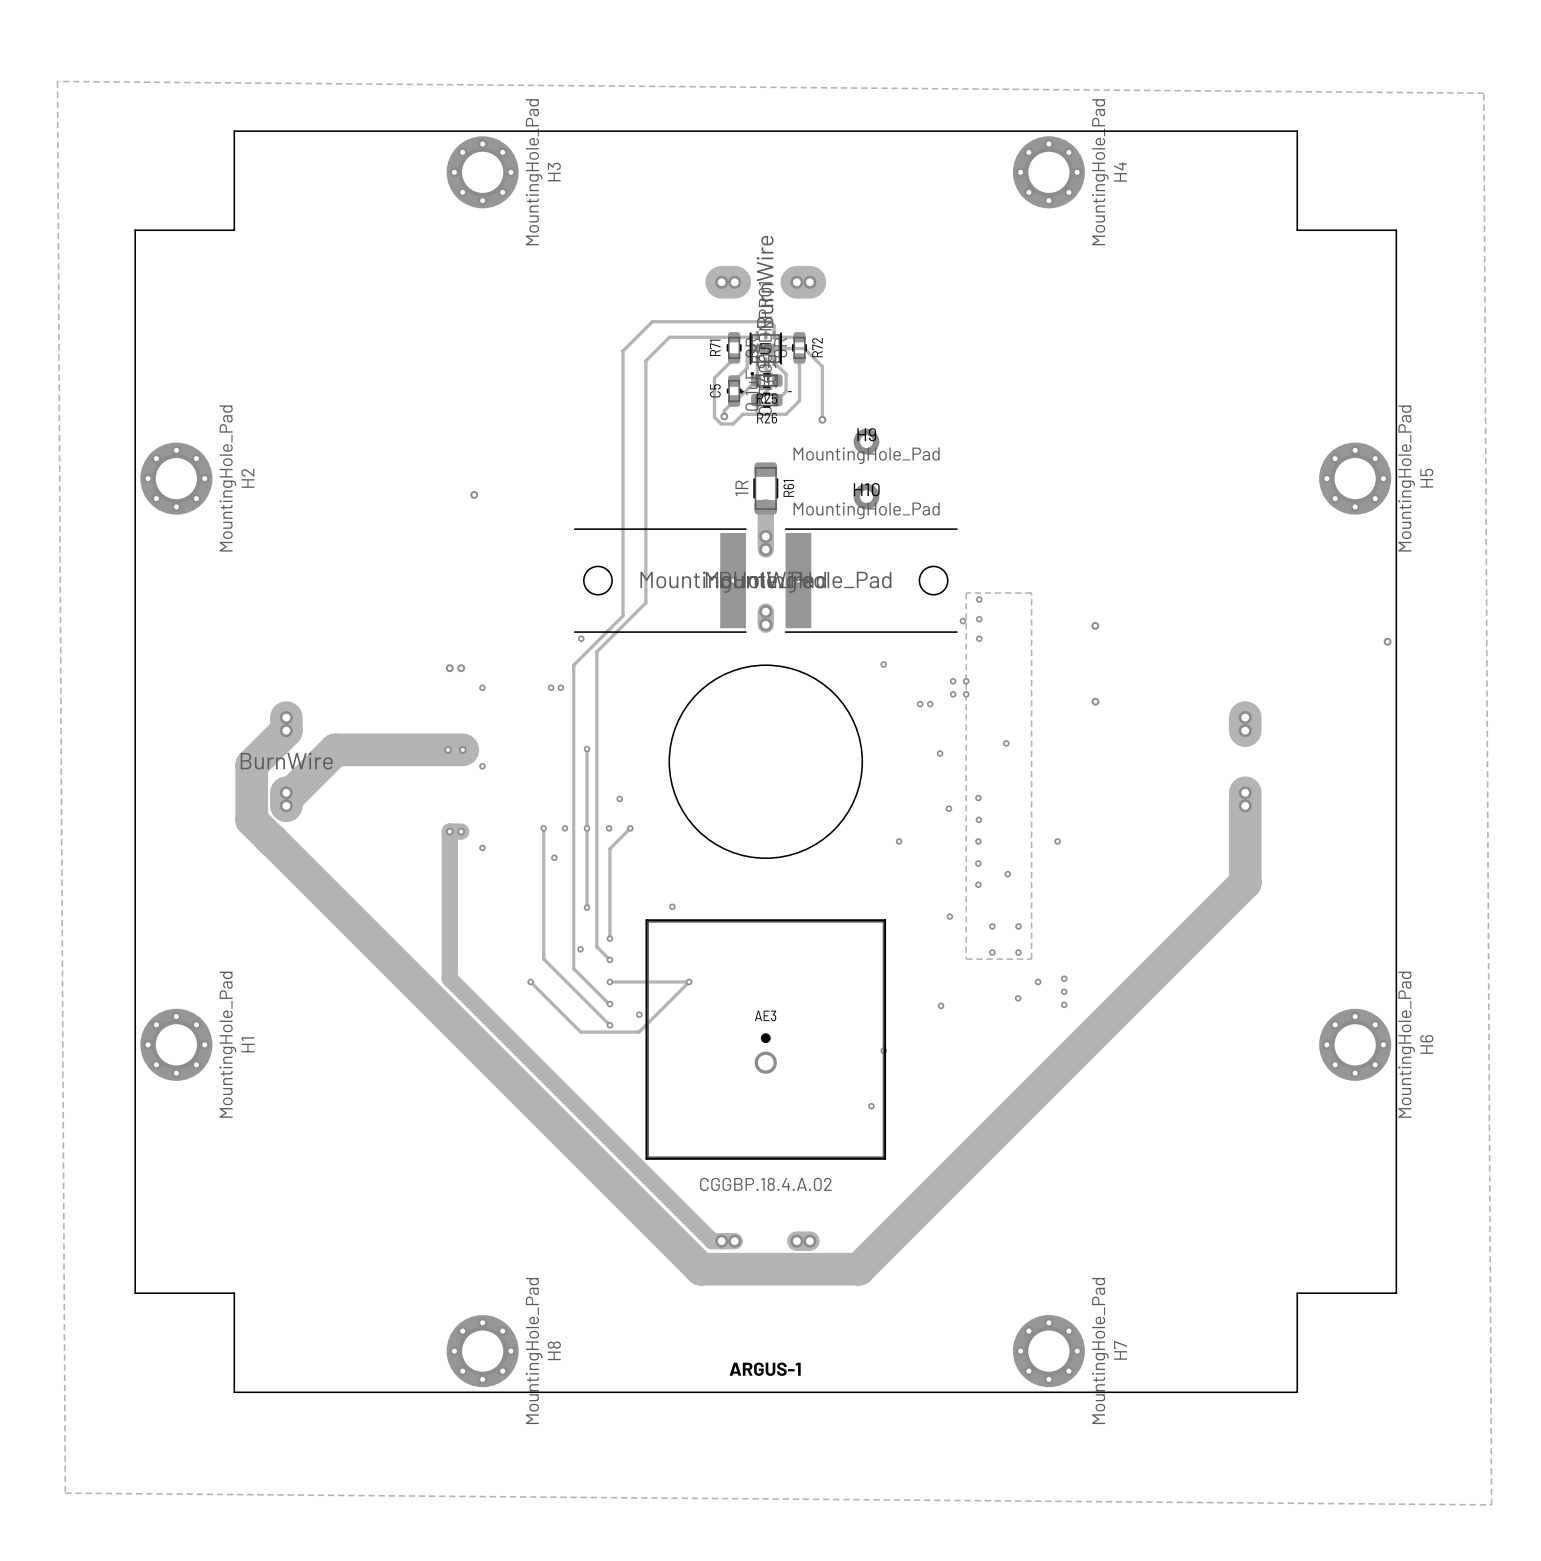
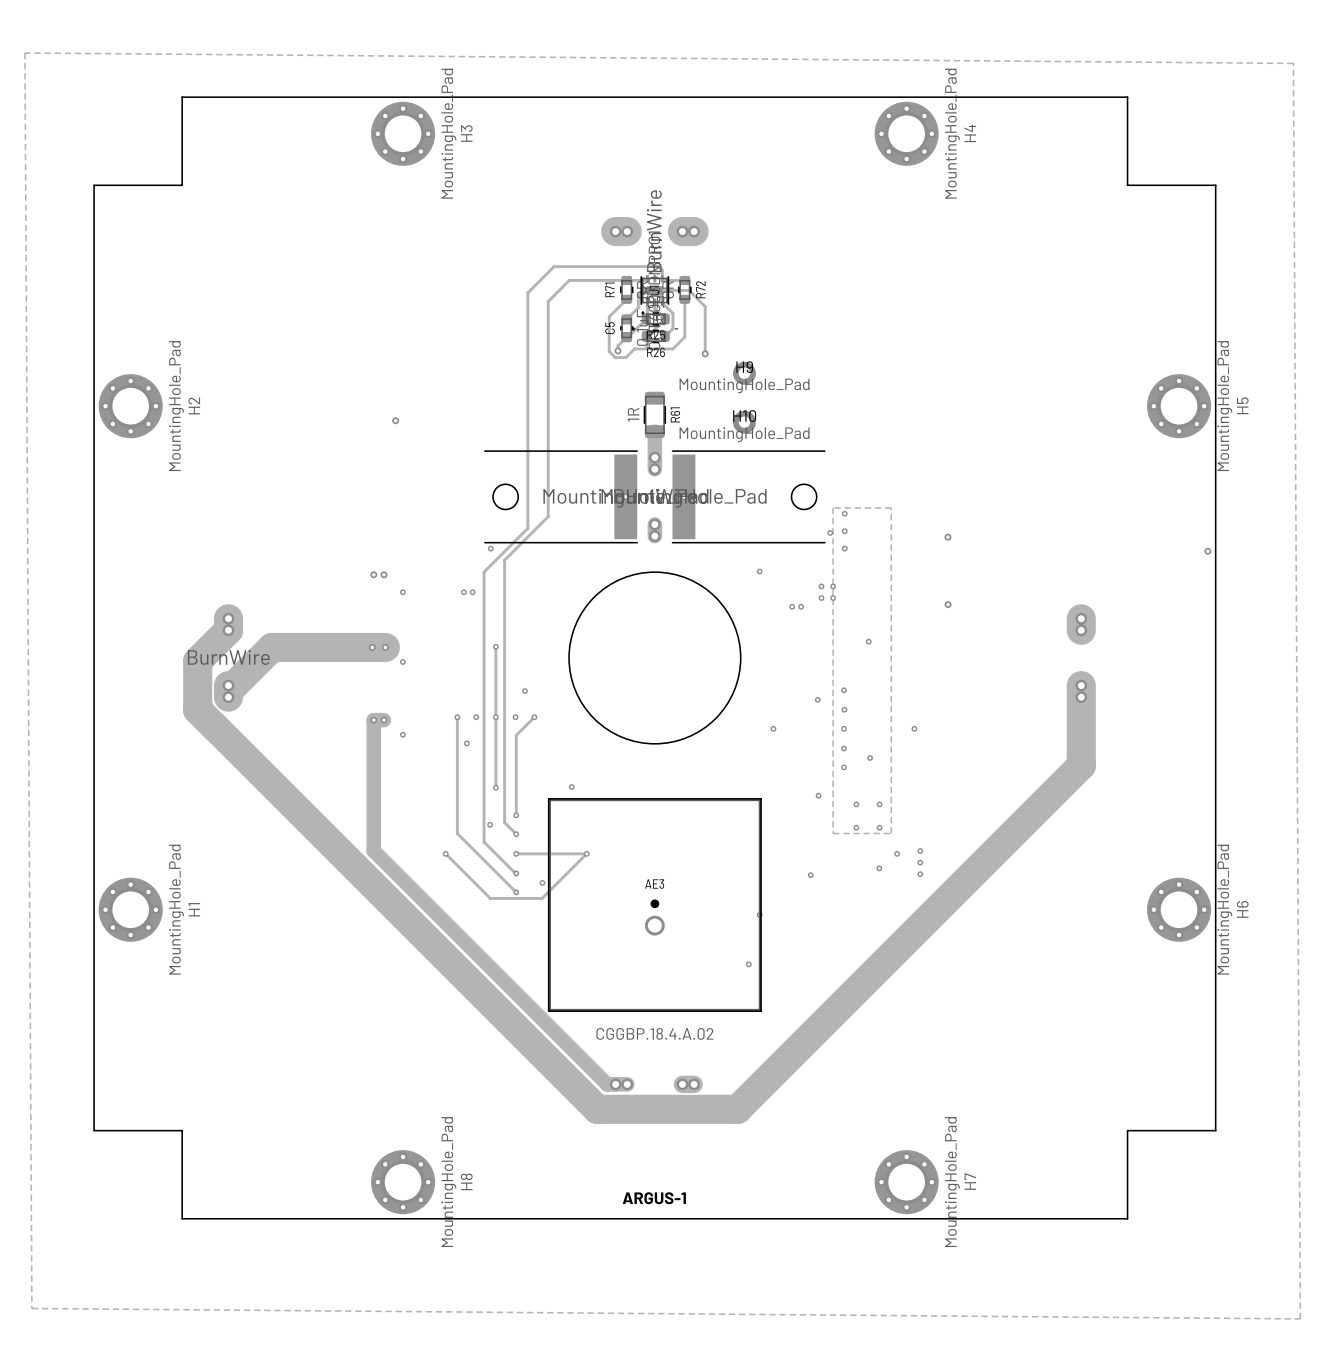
via: (940, 753) -> none

